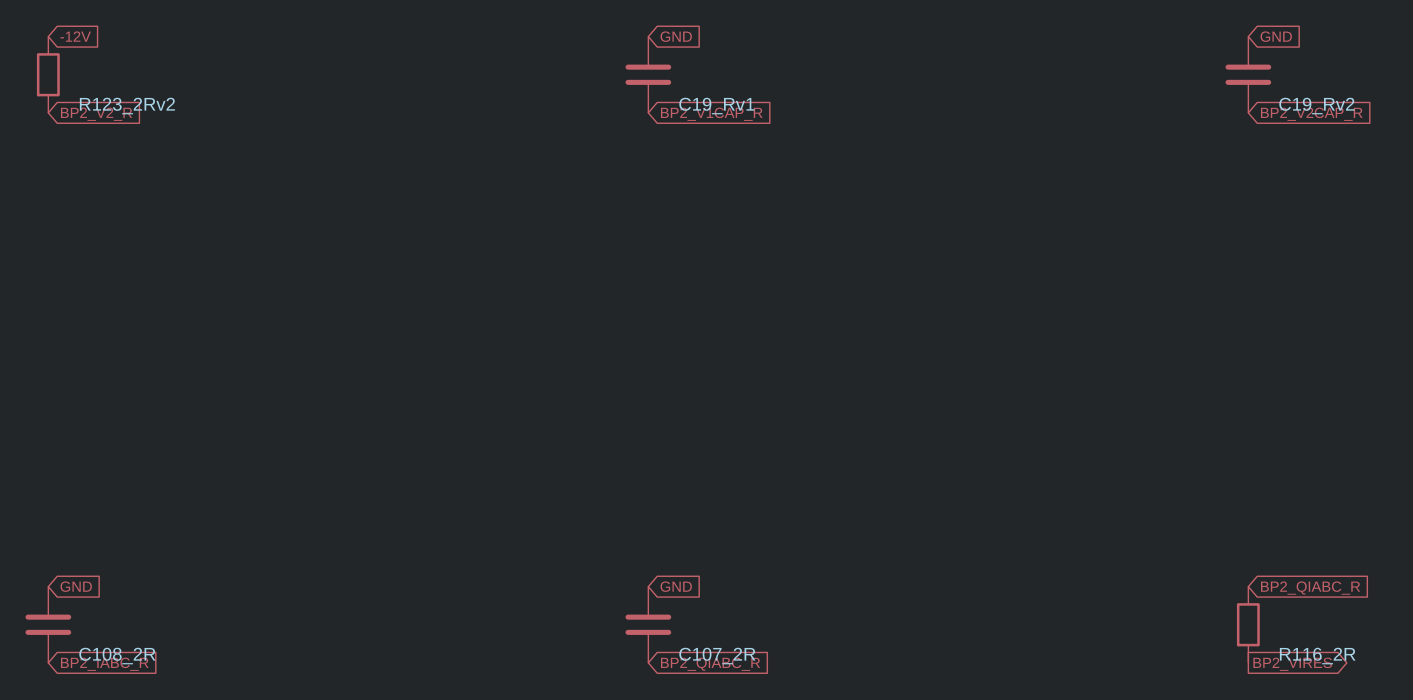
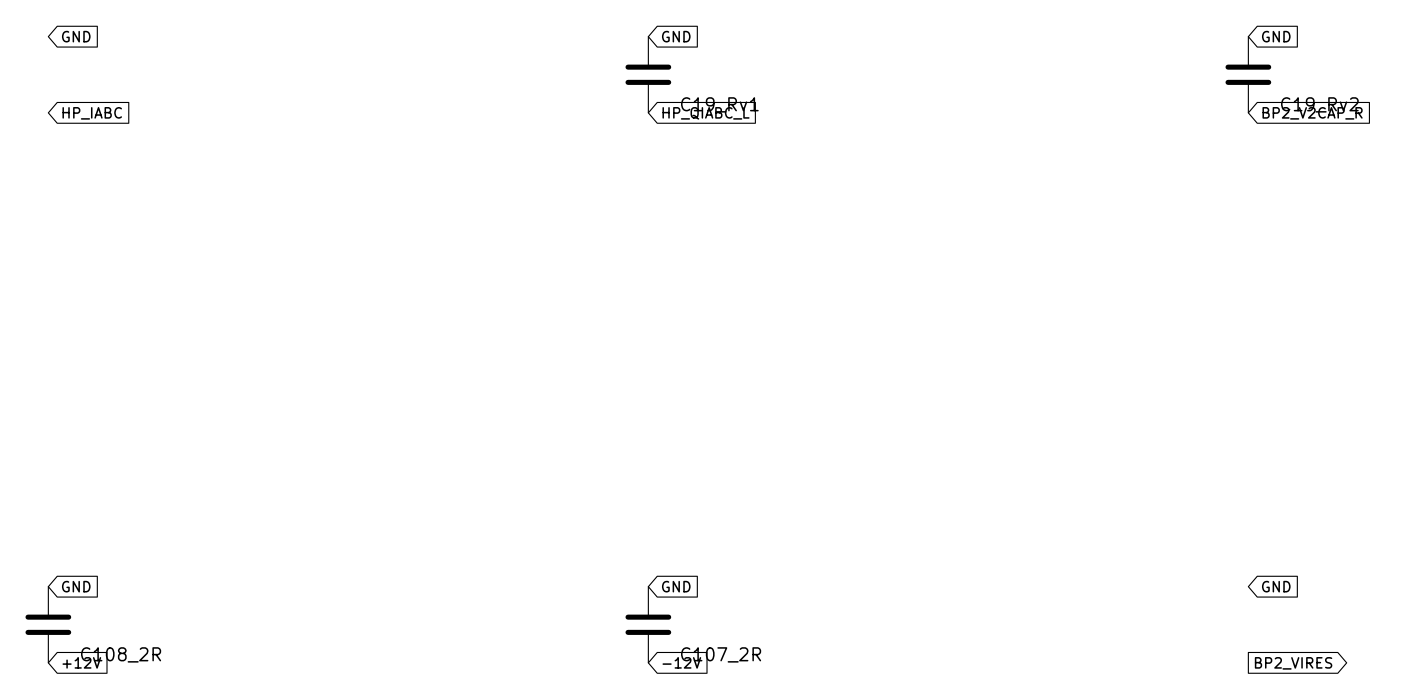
global label: -12V (75, 36) -> GND (76, 36)
R123_2Rv2: (48, 74) -> none
global label: BP2_V2_R (96, 114) -> HP_IABC (92, 113)
global label: BP2_V1CAP_R (711, 114) -> HP_QIABC_L (706, 113)
global label: BP2_QIABC_R (1310, 588) -> GND (1276, 586)
R116_2R: (1248, 624) -> none
global label: BP2_IABC_R (104, 664) -> +12V (81, 662)
global label: BP2_QIABC_R (710, 664) -> -12V (681, 662)

